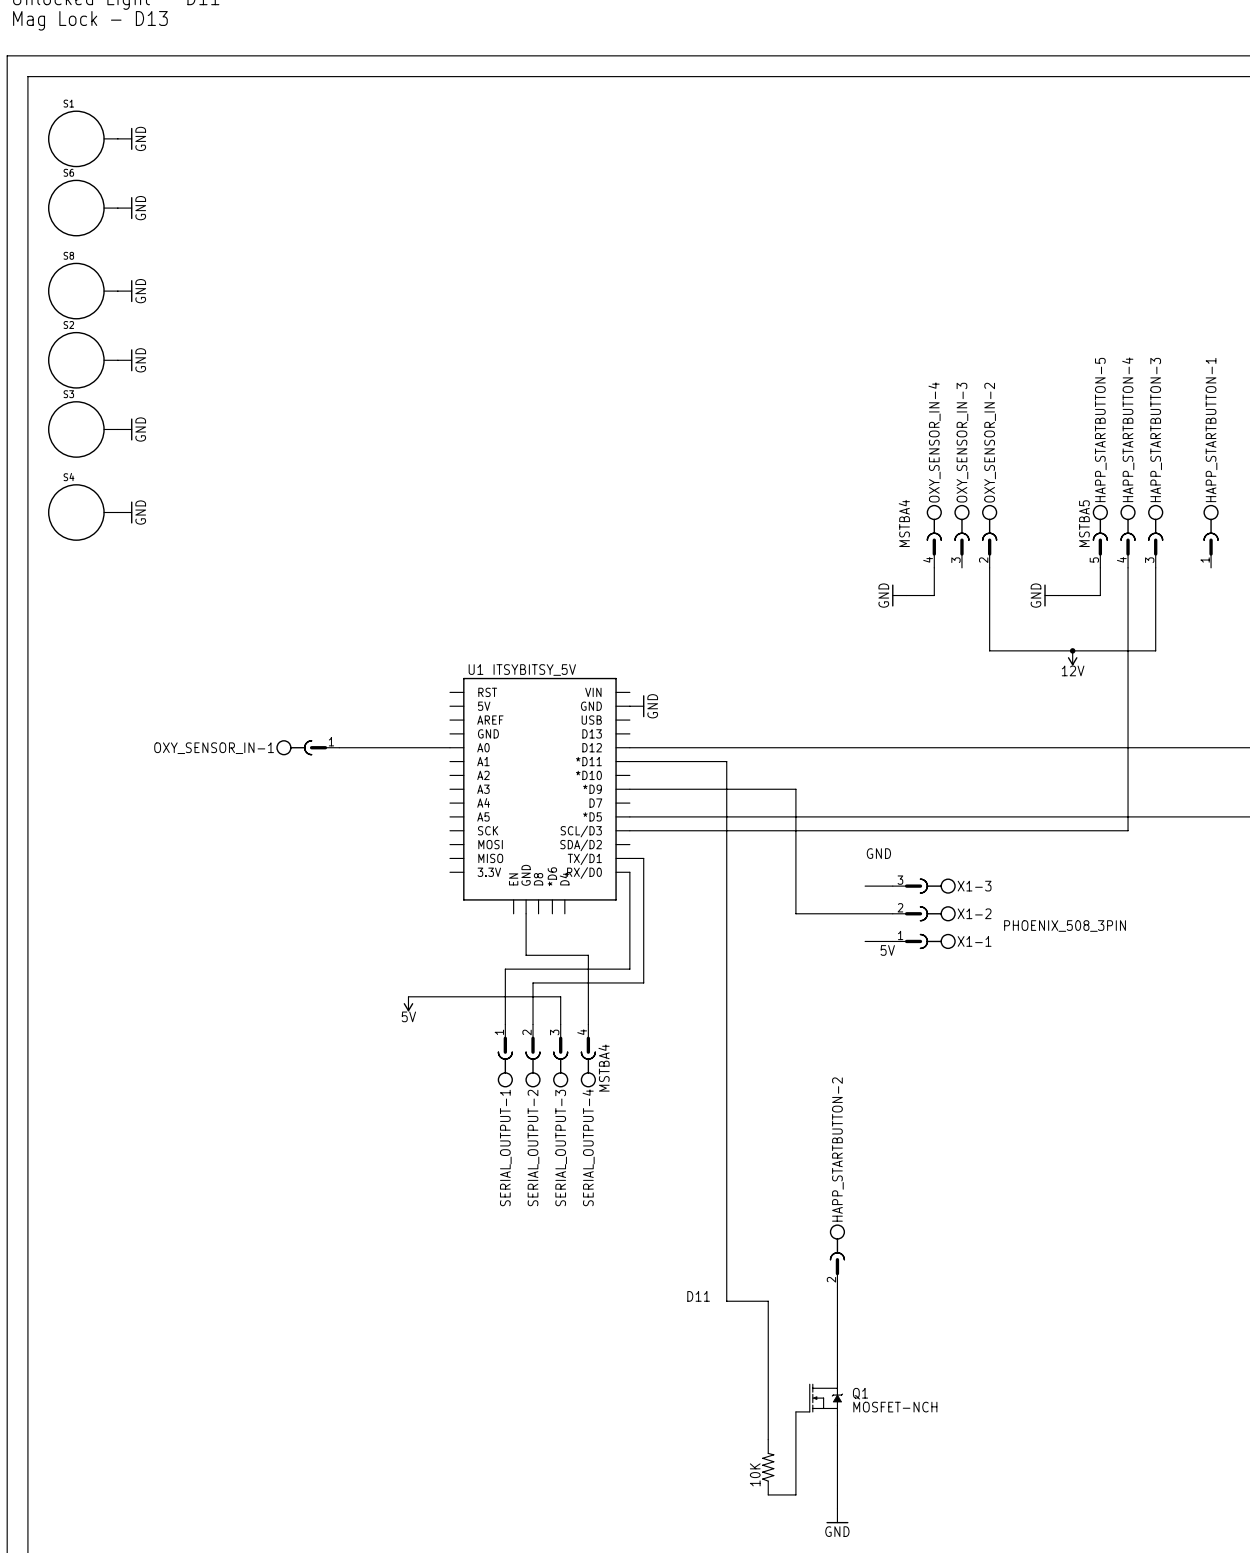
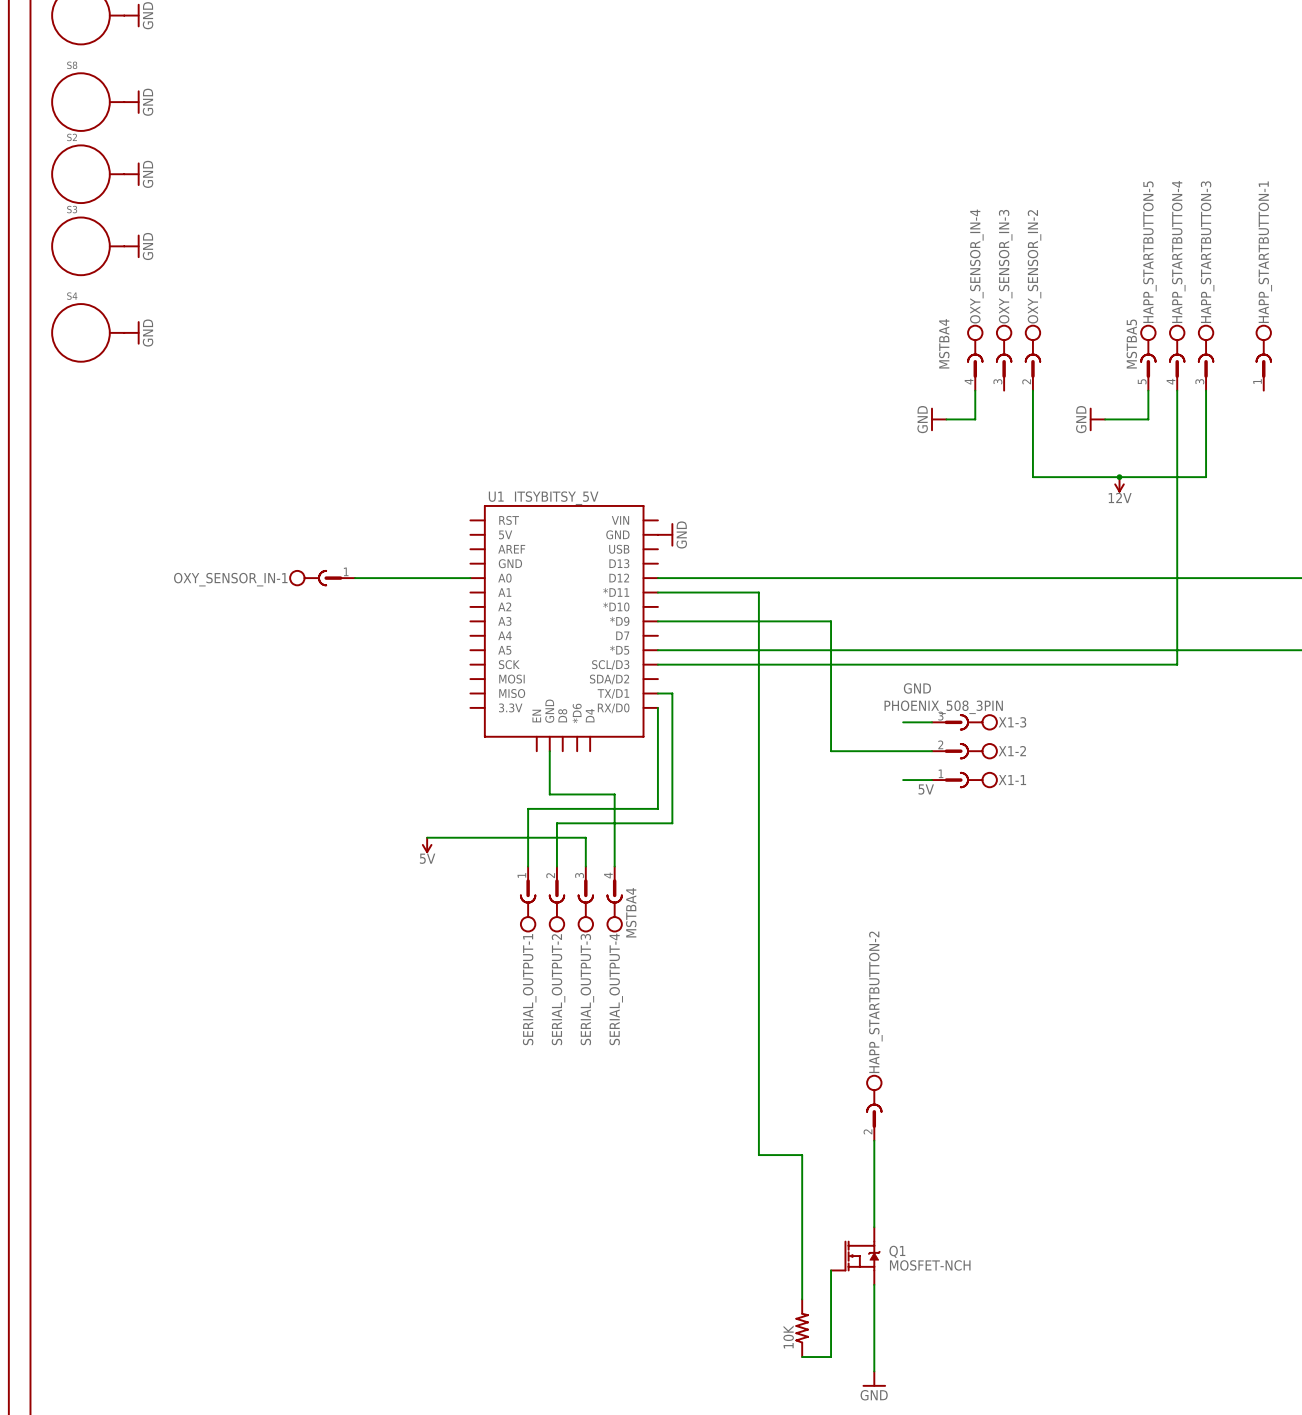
X1-3 value position: PHOENIX_508_3PIN (1065, 926) -> PHOENIX_508_3PIN (943, 707)
label: D11 (698, 1296) -> none

